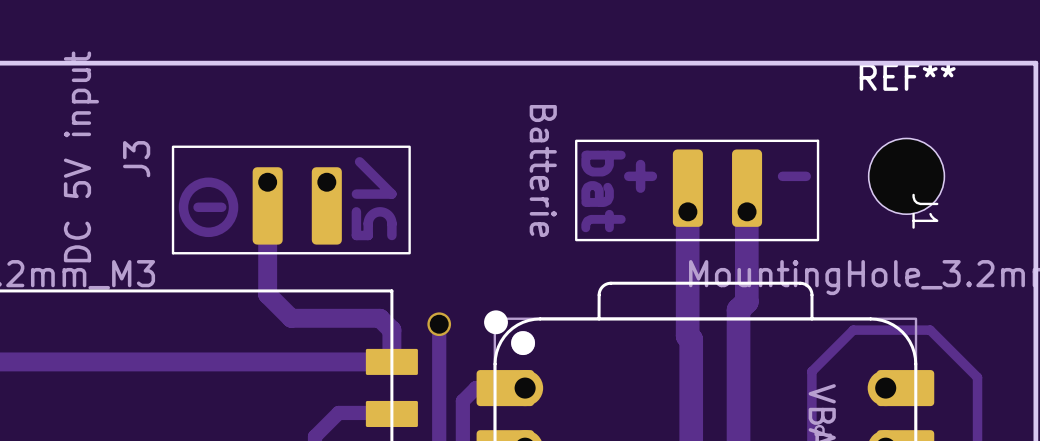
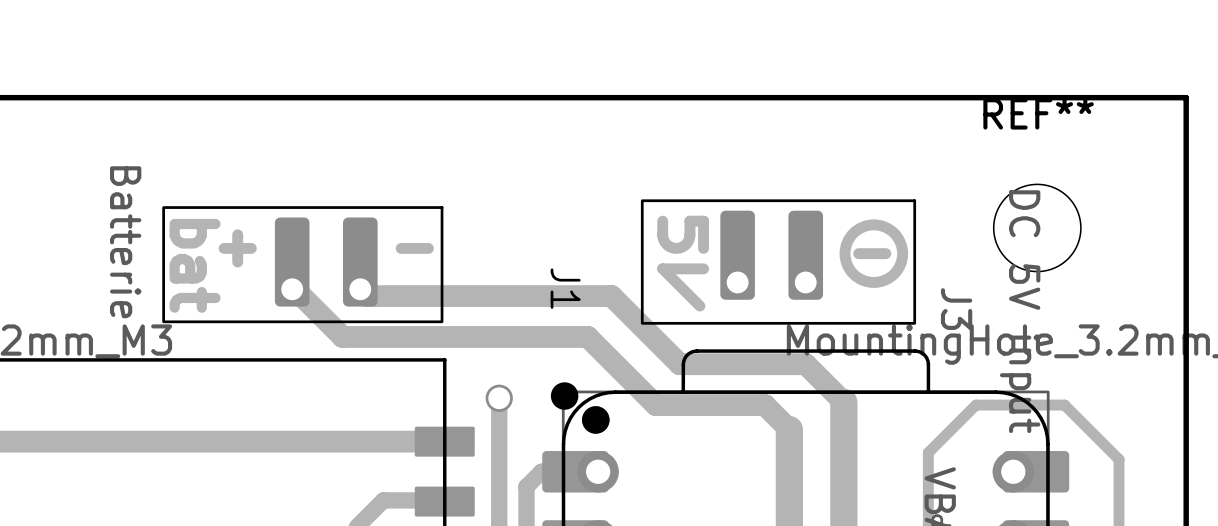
track: (267, 182) (267, 294) (291, 318) (380, 318) (391, 330) (391, 361) -> none
J1 position: (697, 190) -> (302, 264)
J3 rotation: 0° (291, 200) -> 180° (778, 262)
J3 position: (291, 200) -> (778, 262)
track: (687, 212) (687, 336) (691, 339) (691, 351) -> (292, 289) (294, 289) (342, 336) (587, 336) (655, 405) (764, 405) (789, 429)
track: (746, 212) (746, 301) (738, 310) (738, 327) -> (360, 289) (367, 296) (611, 296) (679, 364) (805, 364) (843, 402)

